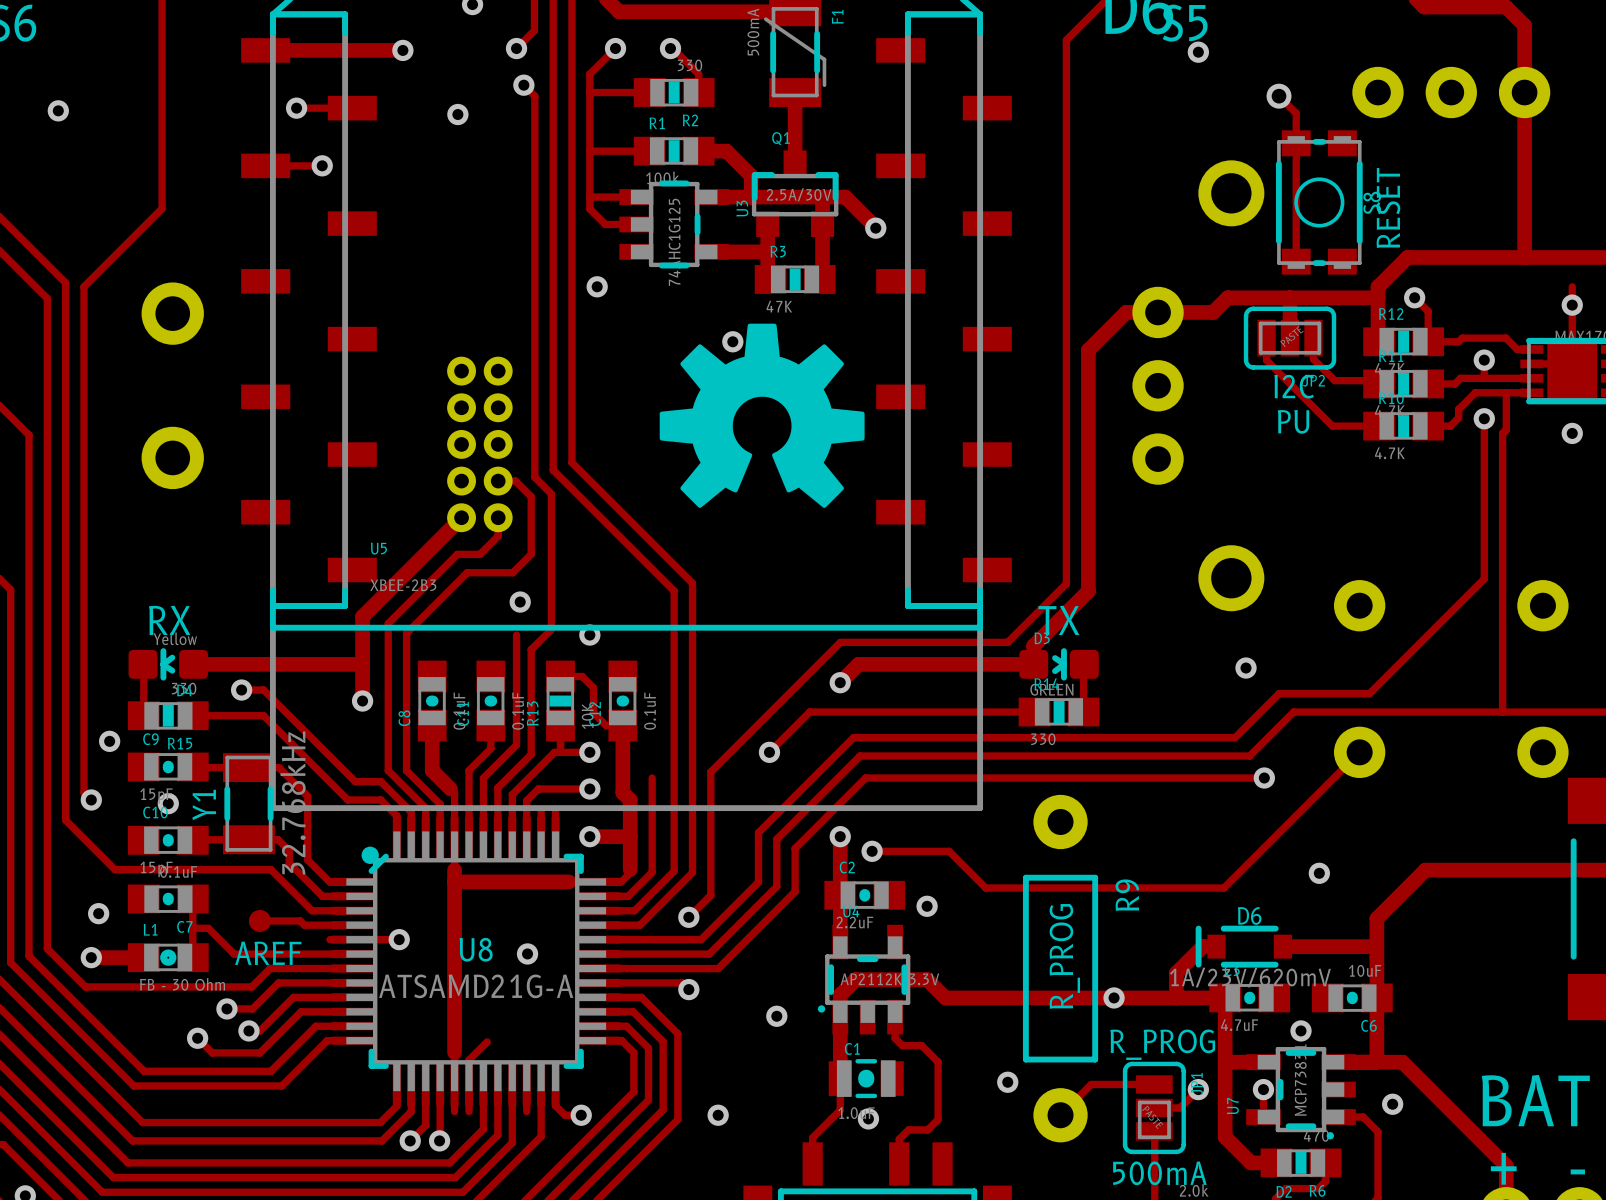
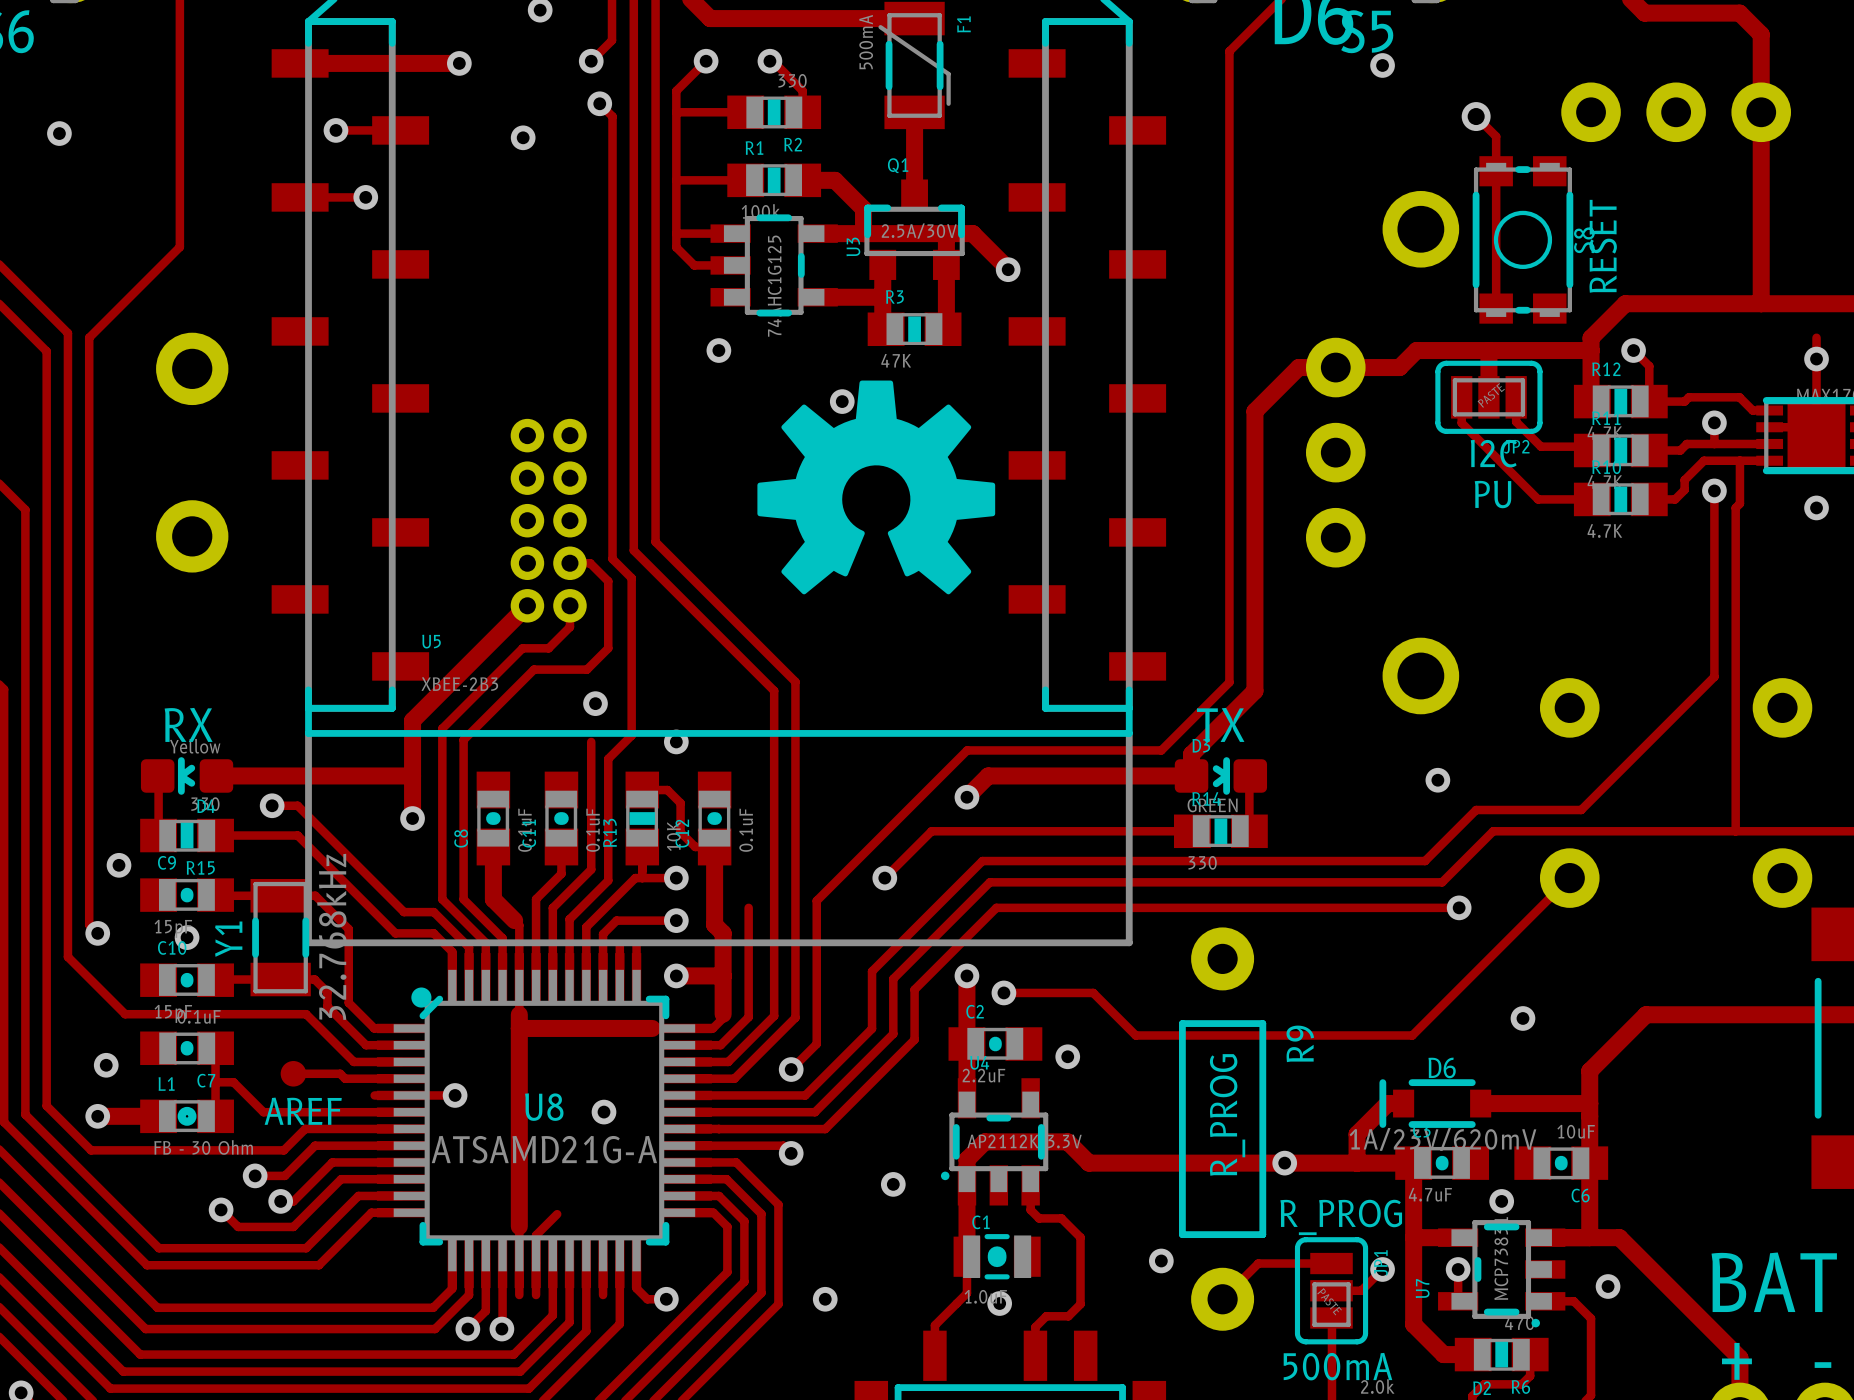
via position: (597, 286) -> (718, 350)

